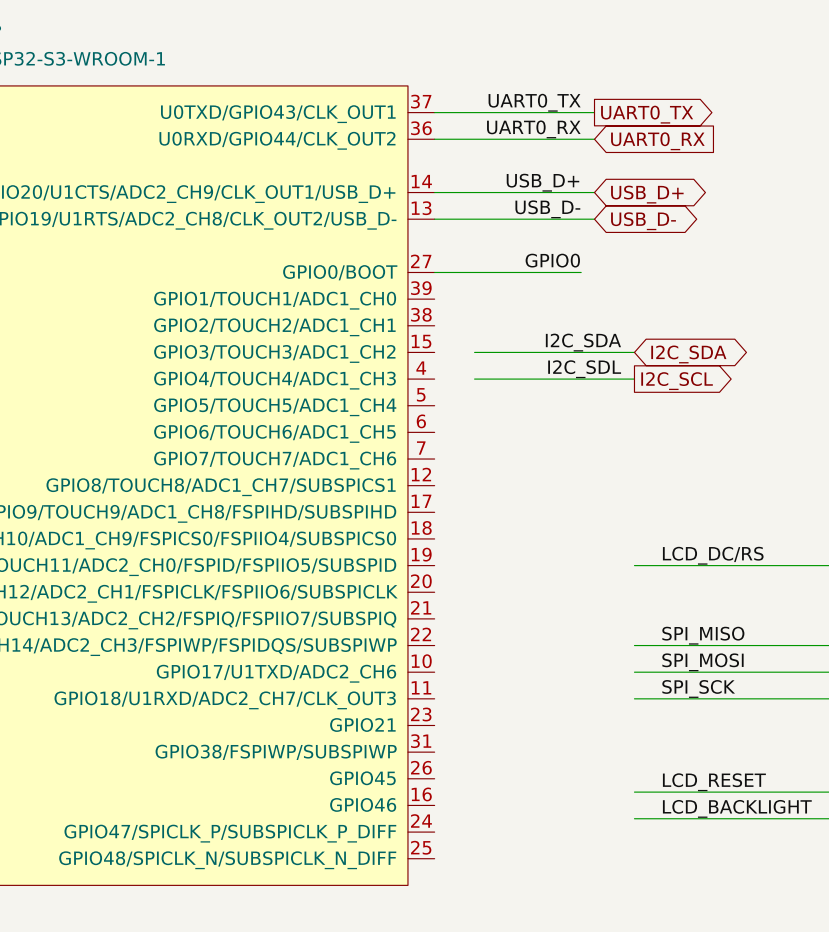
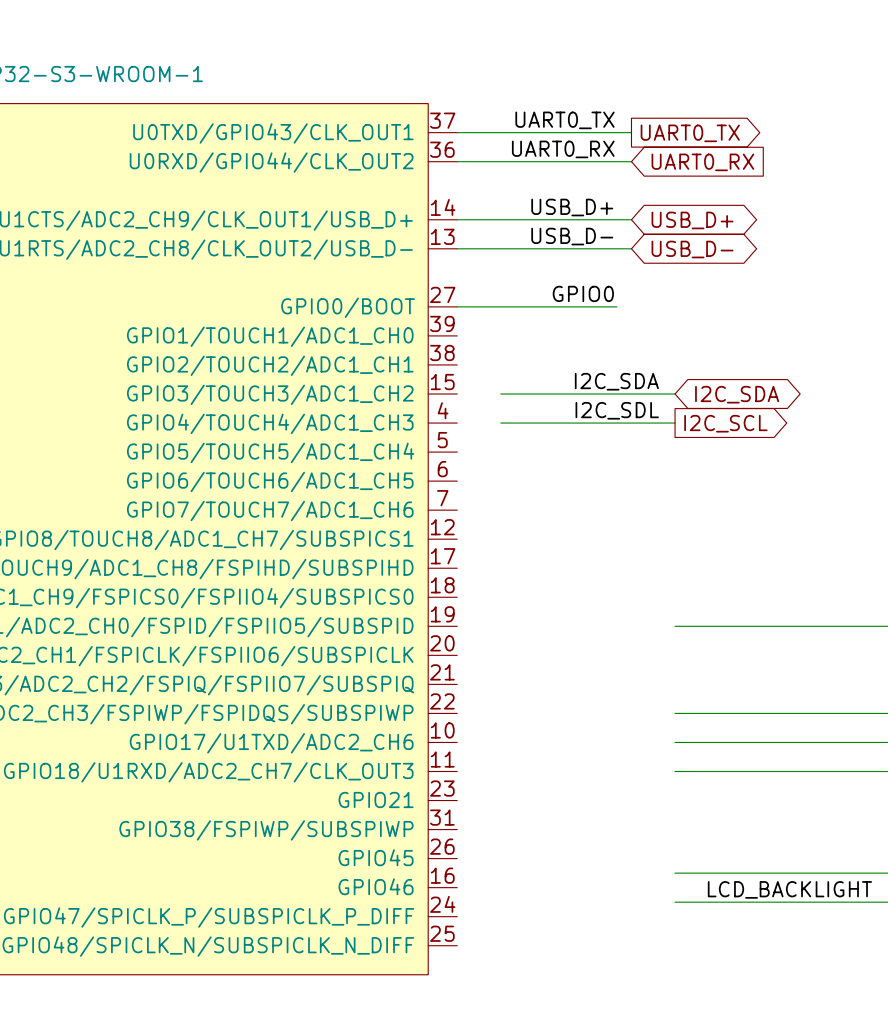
label: LCD_DC/RS (713, 555) -> none
label: SPI_MISO (703, 635) -> none
label: SPI_MOSI (702, 662) -> none
label: SPI_SCK (698, 688) -> none
label: LCD_RESET (714, 782) -> none

